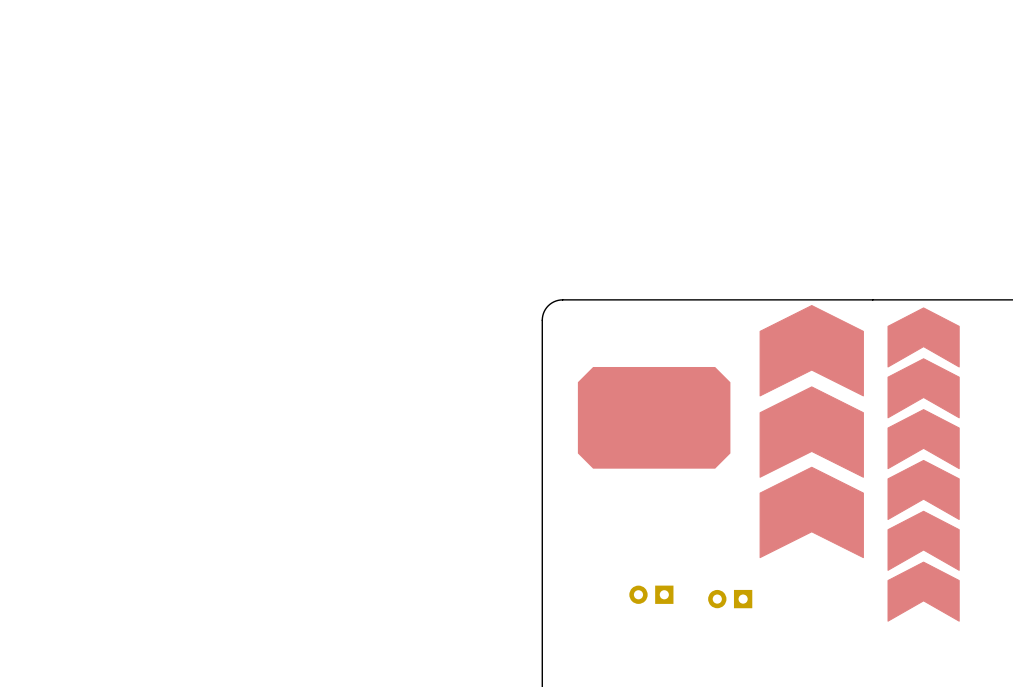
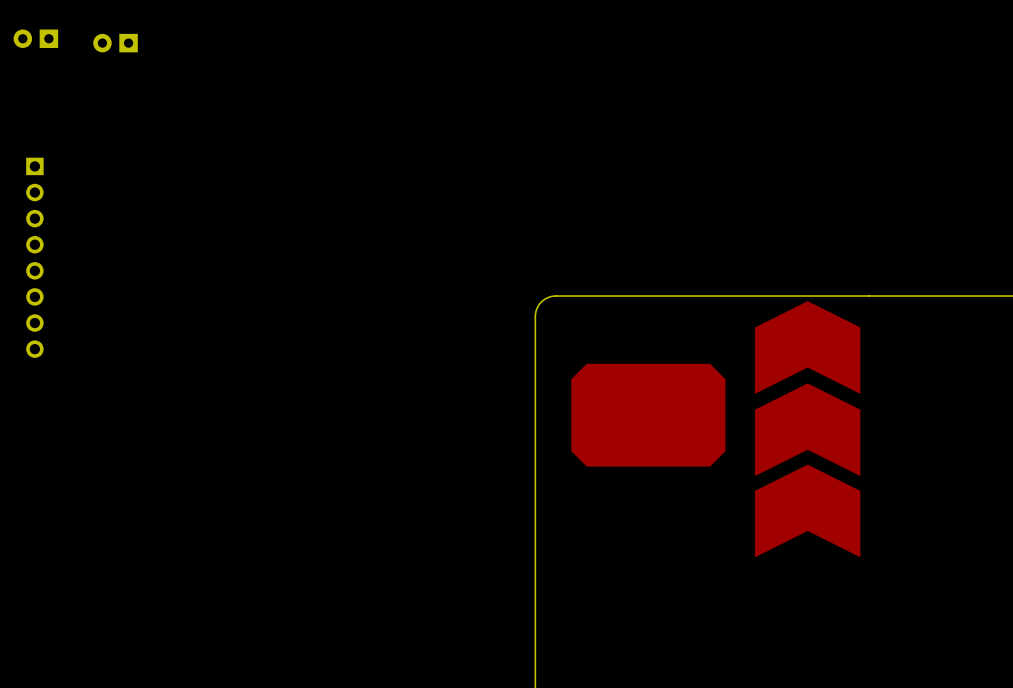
part: none -> (35, 38)
part: none -> (115, 43)
part: none -> (34, 257)
part: (923, 337) -> none
part: (923, 388) -> none
part: (923, 439) -> none
part: (923, 489) -> none
part: (923, 540) -> none
part: (923, 591) -> none
part: (651, 594) -> none
part: (730, 599) -> none

